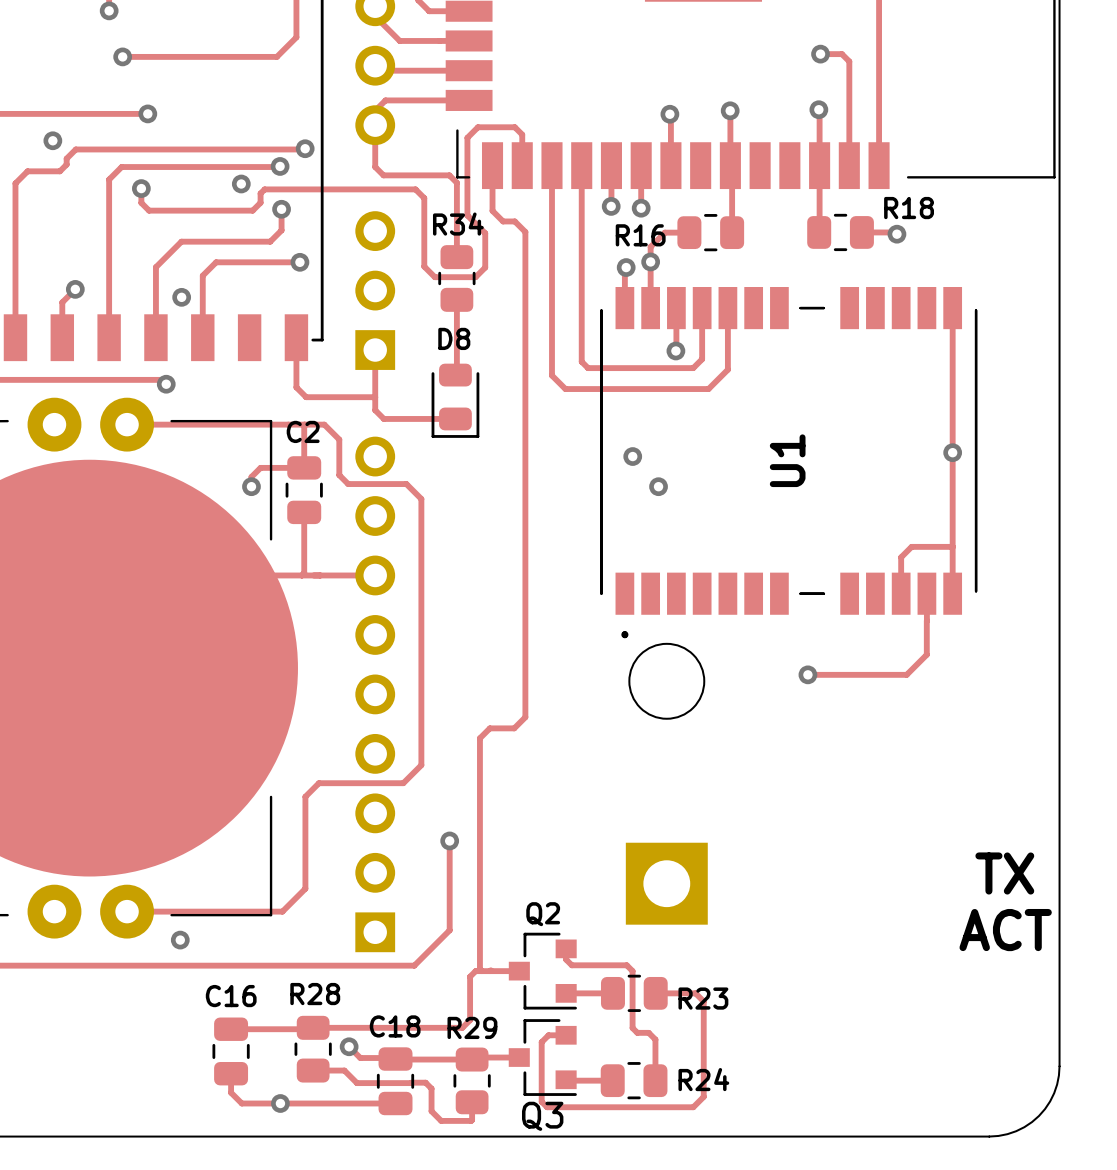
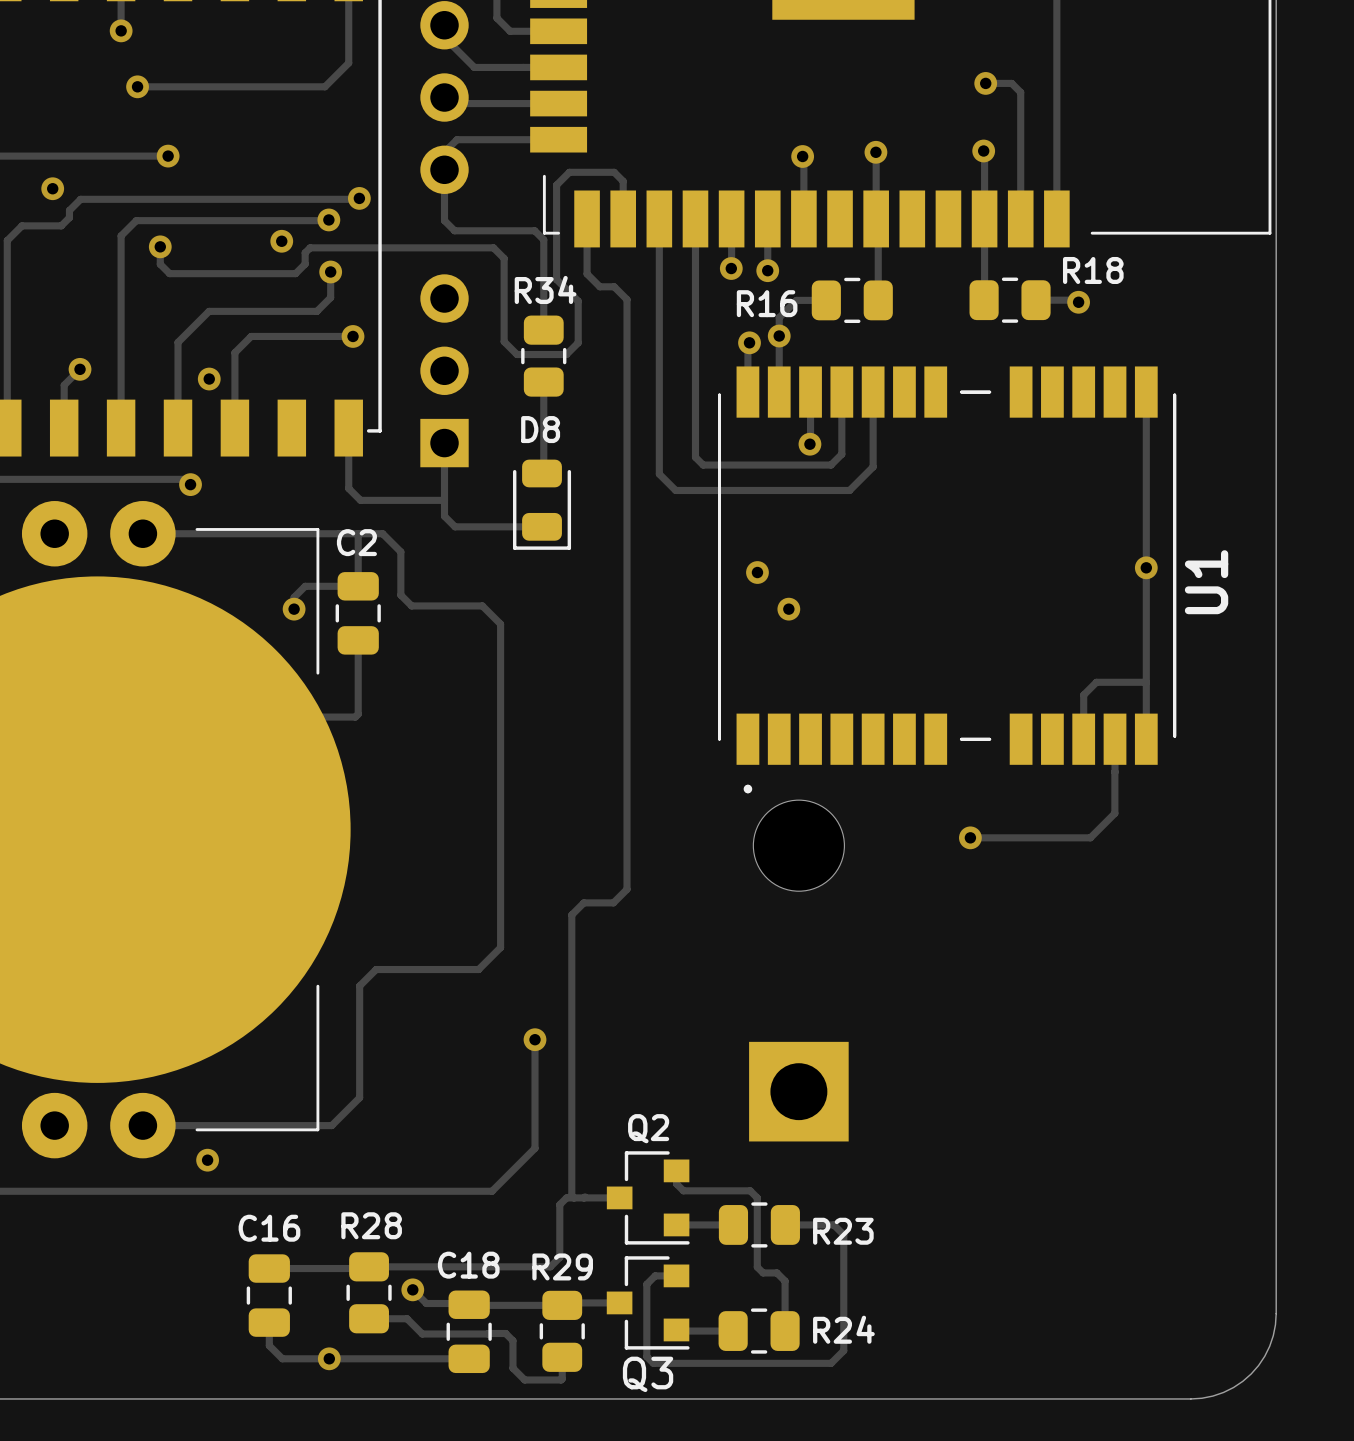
U1 name position: U1 (787, 460) -> U1 (1206, 582)
track: (301, 575) (375, 575) -> none
part: (375, 694) -> none
text: TX (1004, 873) -> none
text: ACT (1005, 930) -> none

